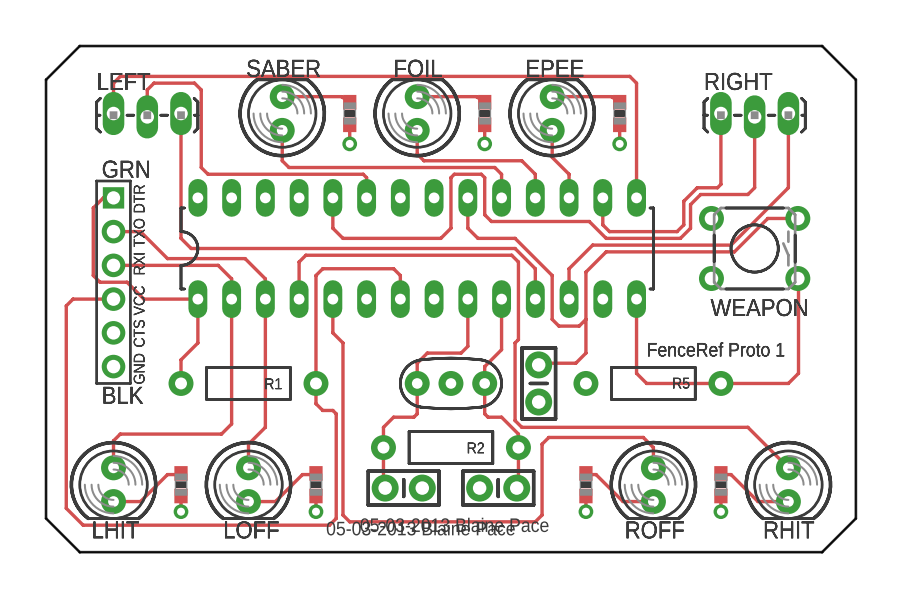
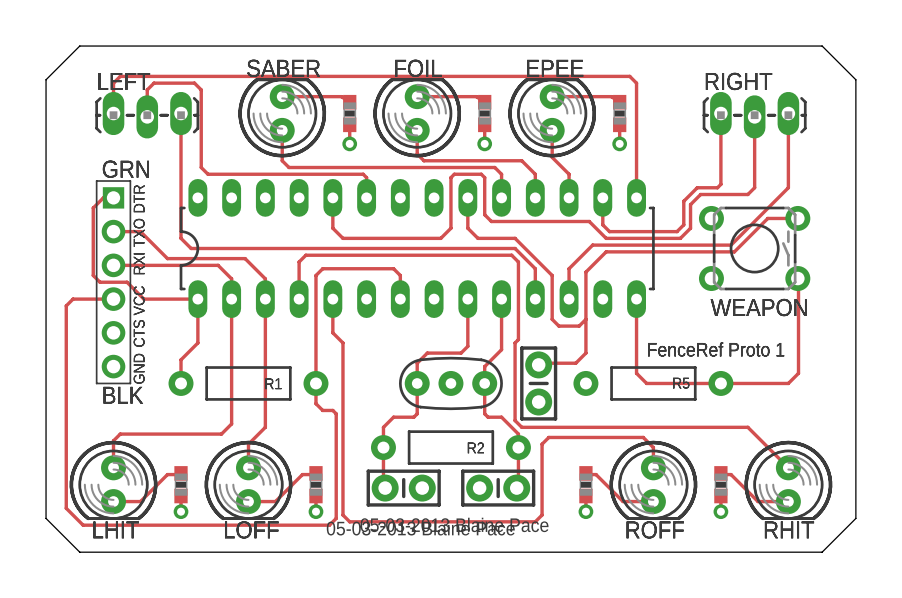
line: (79, 46) (46, 79) (46, 518) (79, 552) (822, 552) (855, 518) (855, 79) (822, 46) (79, 46) -> none
line: (100, 98) (96, 102) (96, 128) (100, 132) -> none
line: (194, 98) (197, 102) (197, 128) (194, 132) -> none
line: (707, 98) (704, 102) (704, 128) (707, 132) -> none
line: (801, 98) (805, 102) (805, 128) (801, 132) -> none
drawing: [344, 110, 355, 117] -> none
drawing: [479, 110, 490, 117] -> none
drawing: [614, 110, 625, 117] -> none
line: (96, 181) (96, 383) (130, 383) (130, 181) (96, 181) -> none
line: (184, 208) (181, 208) (181, 231) (192, 236) (197, 248) (192, 260) (181, 265) (181, 288) (184, 288) -> none
line: (650, 208) (653, 208) (653, 288) (650, 288) -> none
line: (725, 208) (783, 208) -> none
drawing: [729, 223, 780, 274] -> none
line: (714, 234) (714, 261) -> none
line: (795, 234) (795, 262) -> none
line: (725, 288) (783, 288) -> none
line: (521, 348) (521, 418) (555, 418) (555, 348) (521, 348) -> none
line: (420, 359) (407, 366) (400, 380) (403, 395) (414, 405) (450, 408) (481, 407) (492, 402) (499, 392) (501, 383) (499, 374) (494, 366) (487, 361) (450, 358) (420, 359) -> none
line: (206, 367) (206, 399) (290, 399) (290, 367) (206, 367) -> none
line: (611, 367) (695, 367) (695, 399) (611, 399) (611, 367) -> none
line: (530, 383) (547, 383) -> none
line: (409, 431) (409, 463) (492, 463) (492, 431) (409, 431) -> none
line: (368, 471) (439, 471) (439, 504) (368, 504) (368, 471) -> none
line: (462, 471) (533, 471) (533, 504) (462, 504) (462, 471) -> none
line: (403, 479) (403, 496) -> none
line: (498, 479) (498, 496) -> none
drawing: [175, 481, 187, 488] -> none
drawing: [310, 481, 322, 488] -> none
drawing: [580, 481, 591, 488] -> none
drawing: [715, 481, 726, 488] -> none

